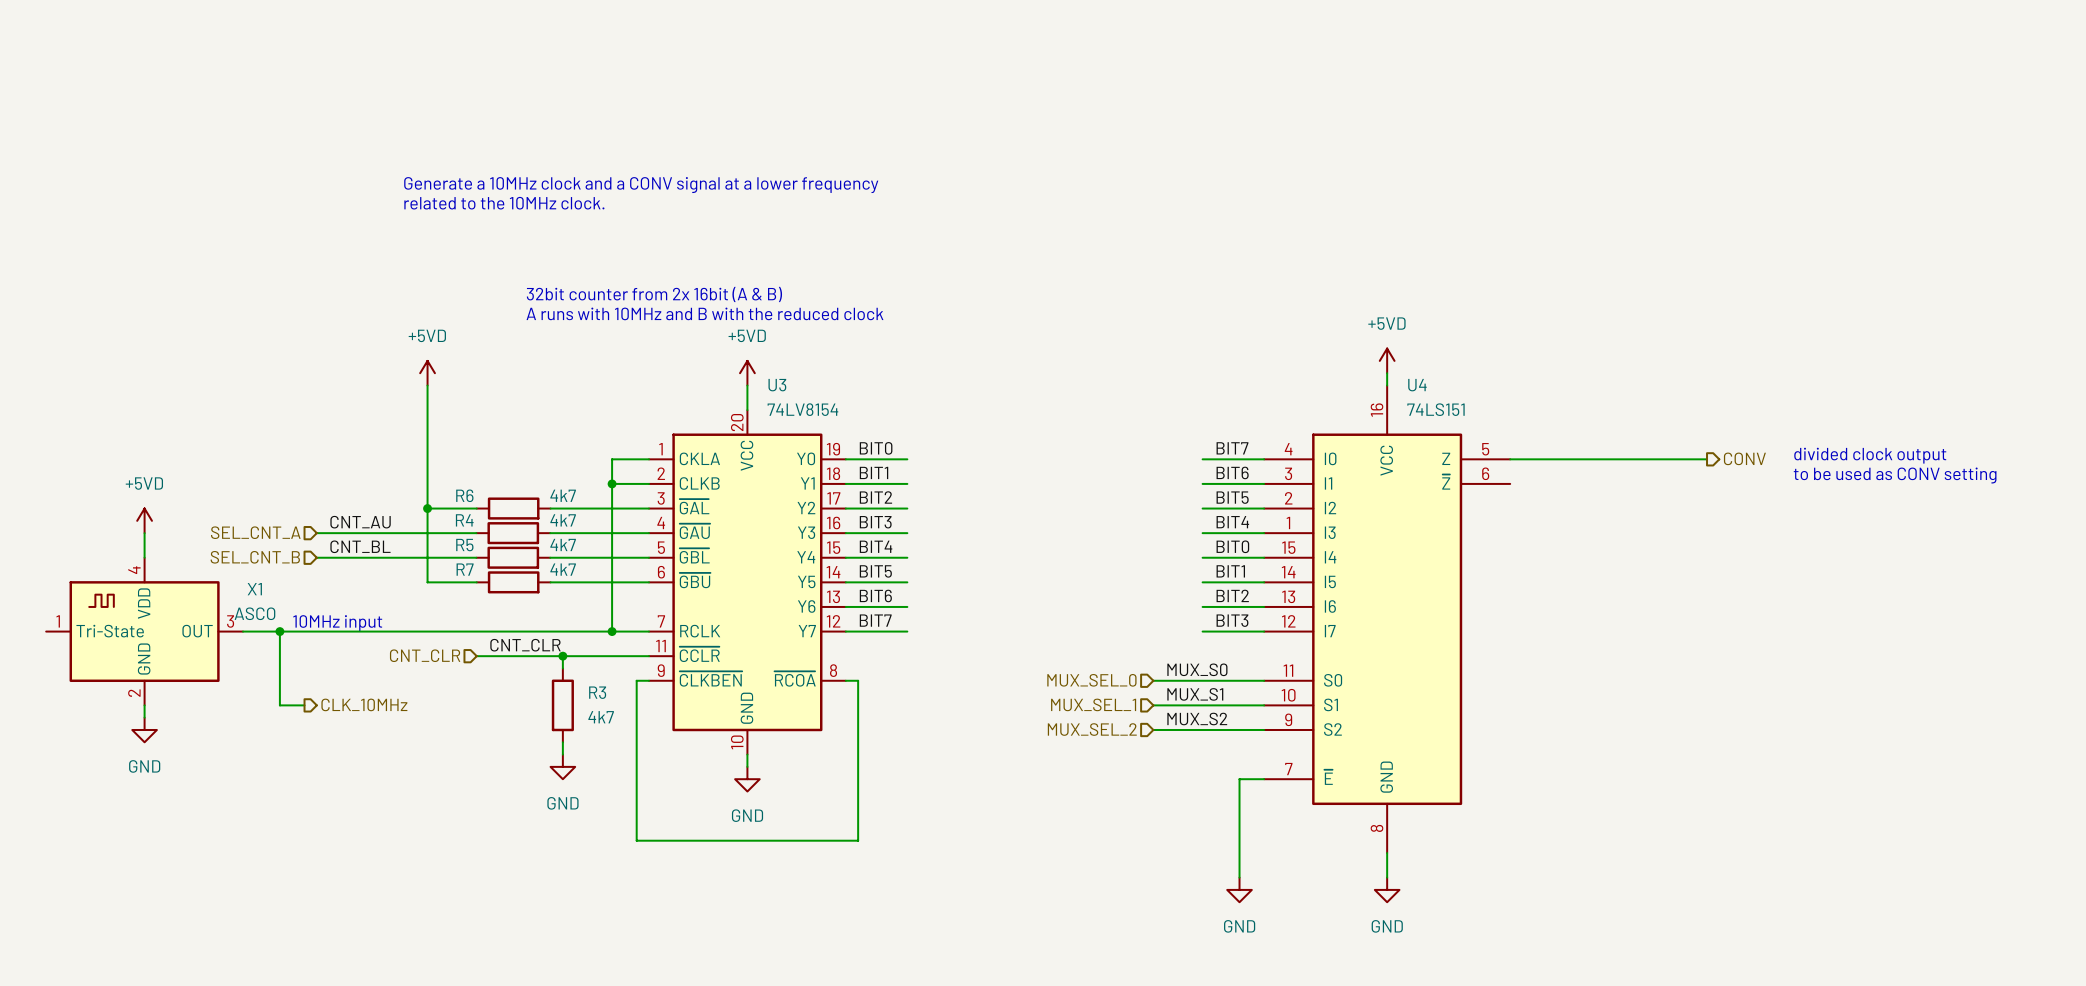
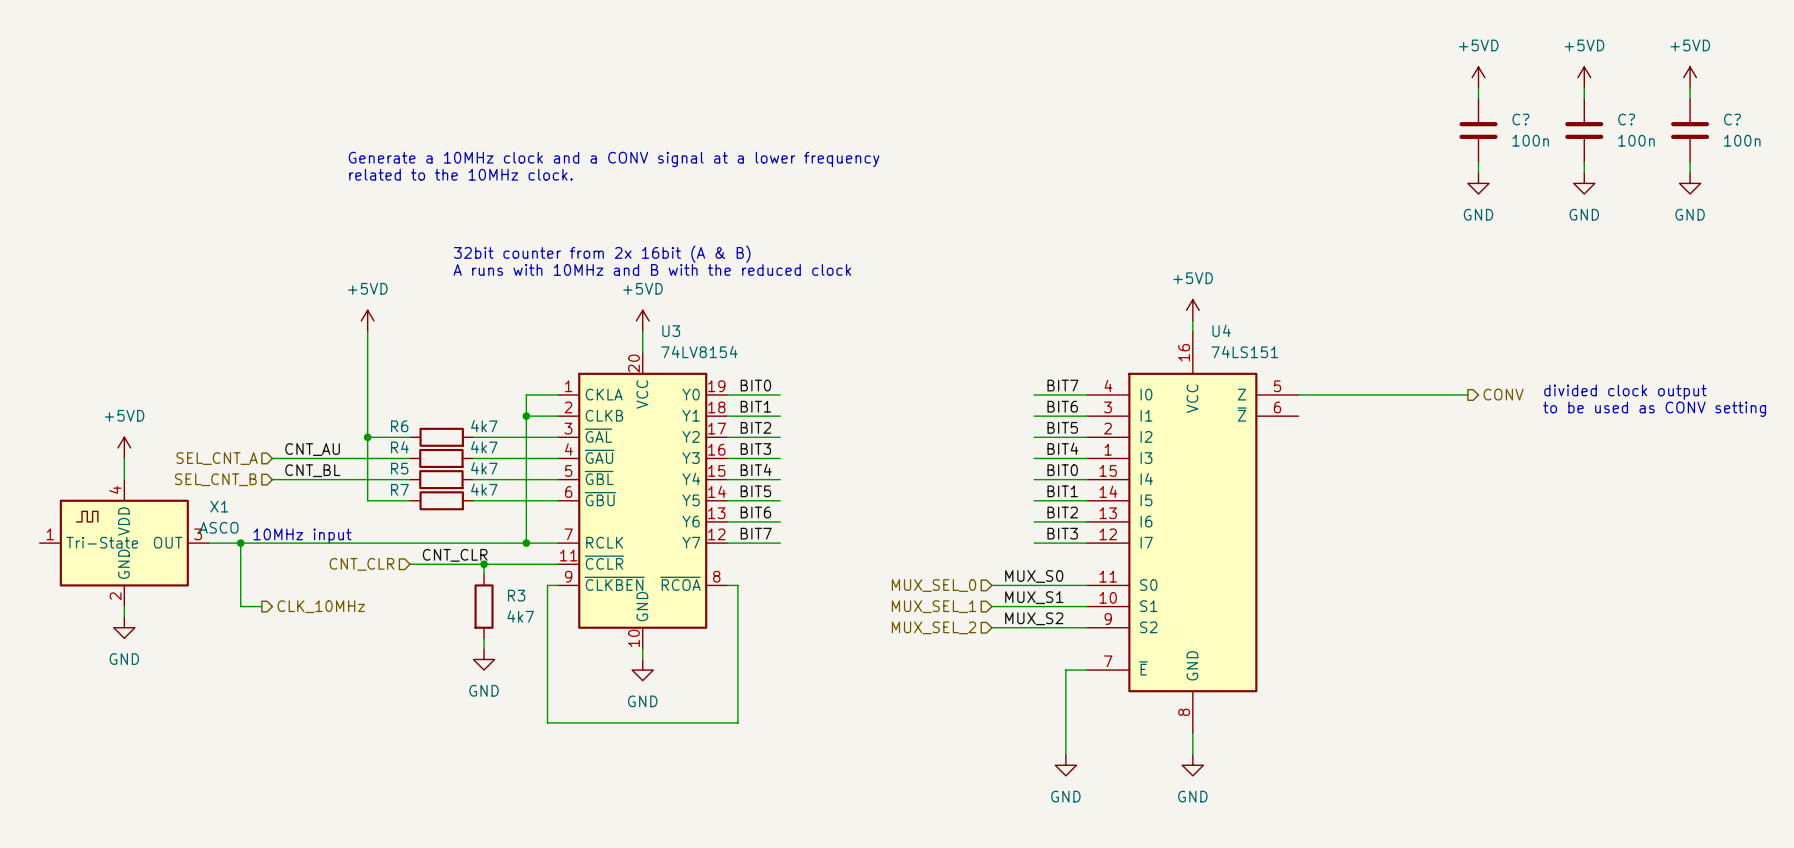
power symbol: none -> +5VD (1478, 77)
power symbol: none -> +5VD (1584, 77)
power symbol: none -> +5VD (1690, 77)
wire: none -> (1478, 88) (1478, 98)
wire: none -> (1584, 88) (1584, 98)
wire: none -> (1690, 88) (1690, 98)
C?: none -> 100n (1478, 130)
C?: none -> 100n (1584, 130)
C?: none -> 100n (1690, 130)
wire: none -> (1478, 162) (1478, 172)
wire: none -> (1584, 162) (1584, 172)
wire: none -> (1690, 162) (1690, 172)
power symbol: none -> GND (1478, 183)
power symbol: none -> GND (1584, 183)
power symbol: none -> GND (1690, 183)

